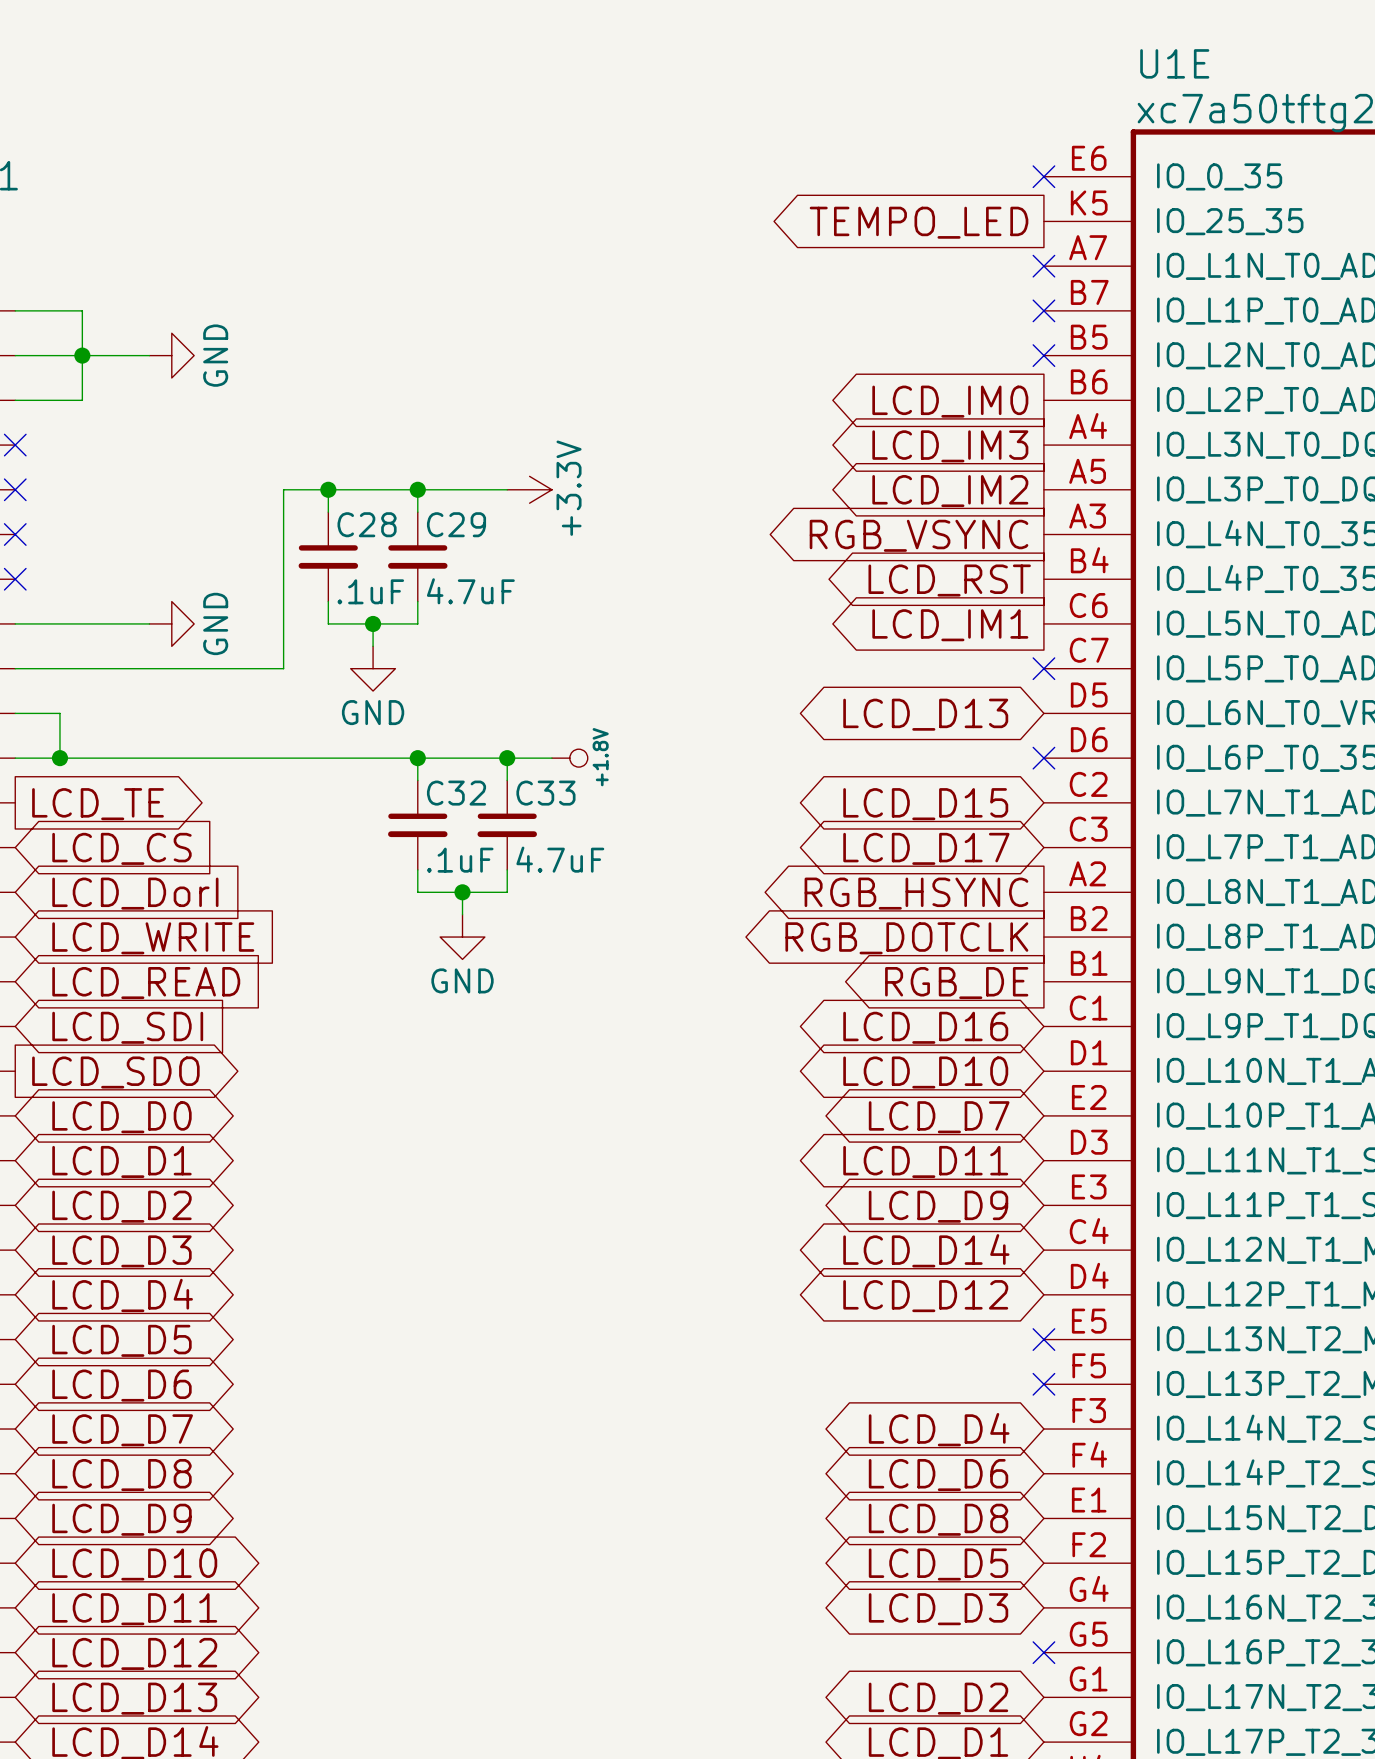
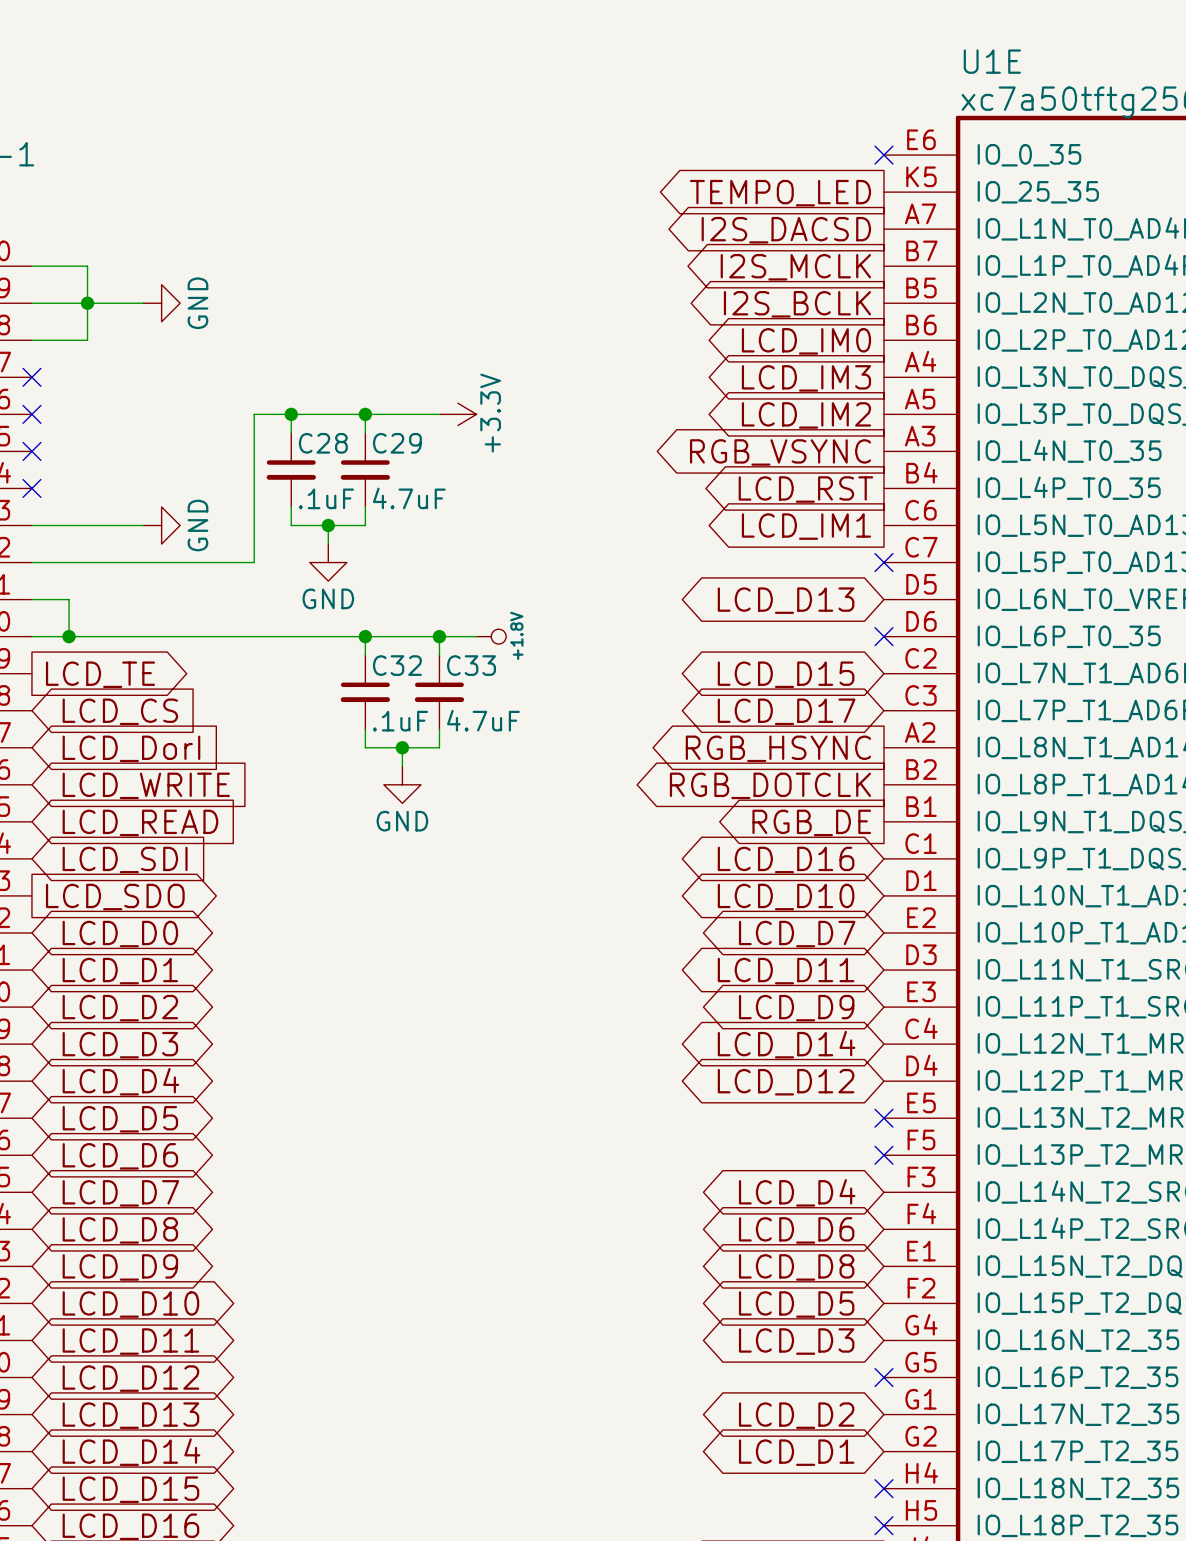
no-connect mark: (1043, 266) -> none
global label: none -> I2S_DACSD (786, 230)
no-connect mark: (1043, 310) -> none
global label: none -> I2S_MCLK (795, 267)
no-connect mark: (1043, 355) -> none
global label: none -> I2S_BCLK (797, 304)

